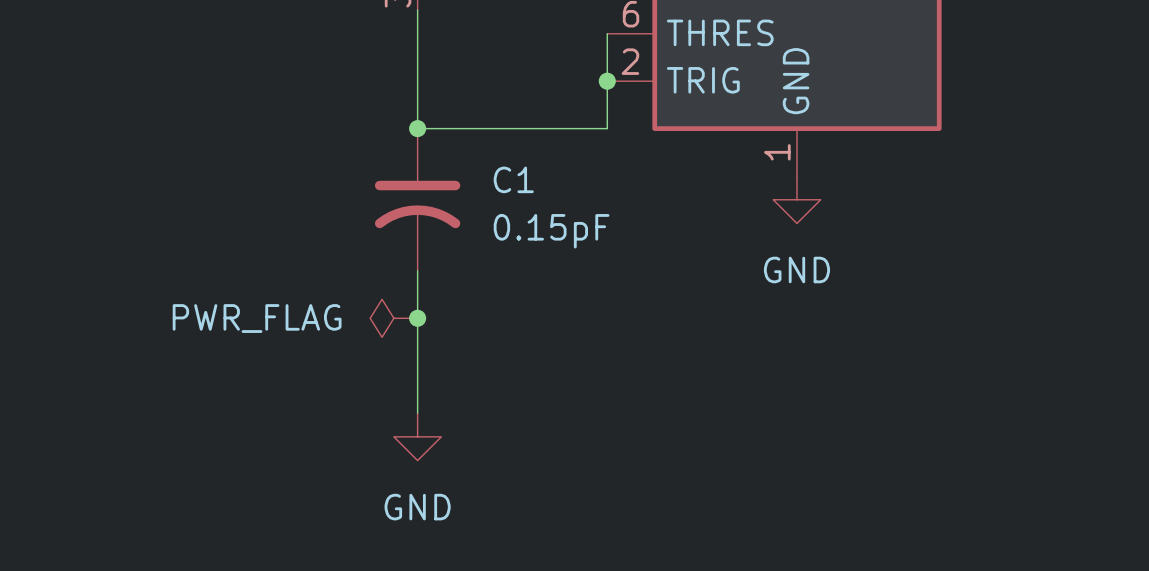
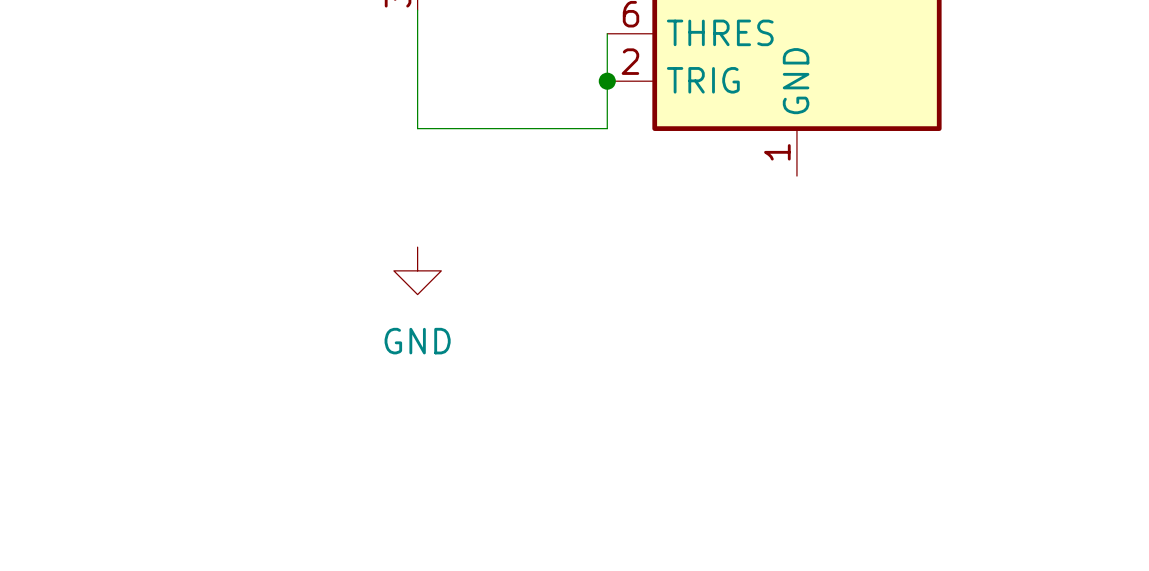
junction: (417, 128) -> none
C1: 0.15pF (417, 199) -> none
power symbol: GND (796, 199) -> none
wire: (417, 270) (417, 413) -> none
power symbol: PWR_FLAG (393, 318) -> none
junction: (417, 318) -> none
power symbol position: GND (417, 436) -> GND (417, 270)

